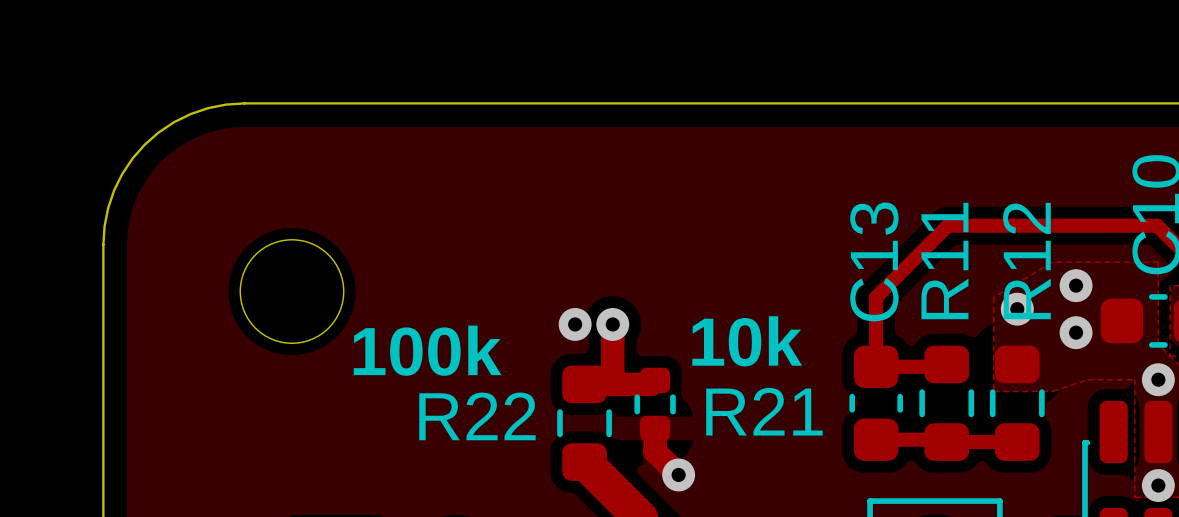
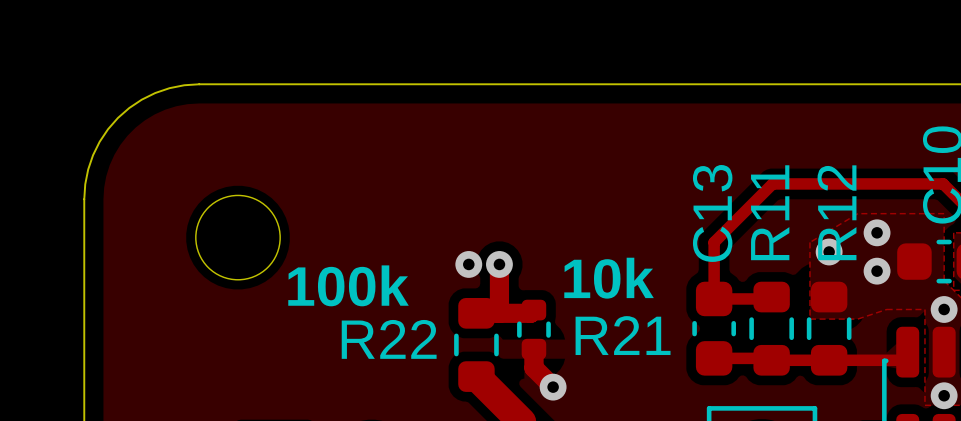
track: none -> (907, 352) (899, 360) (829, 360)

